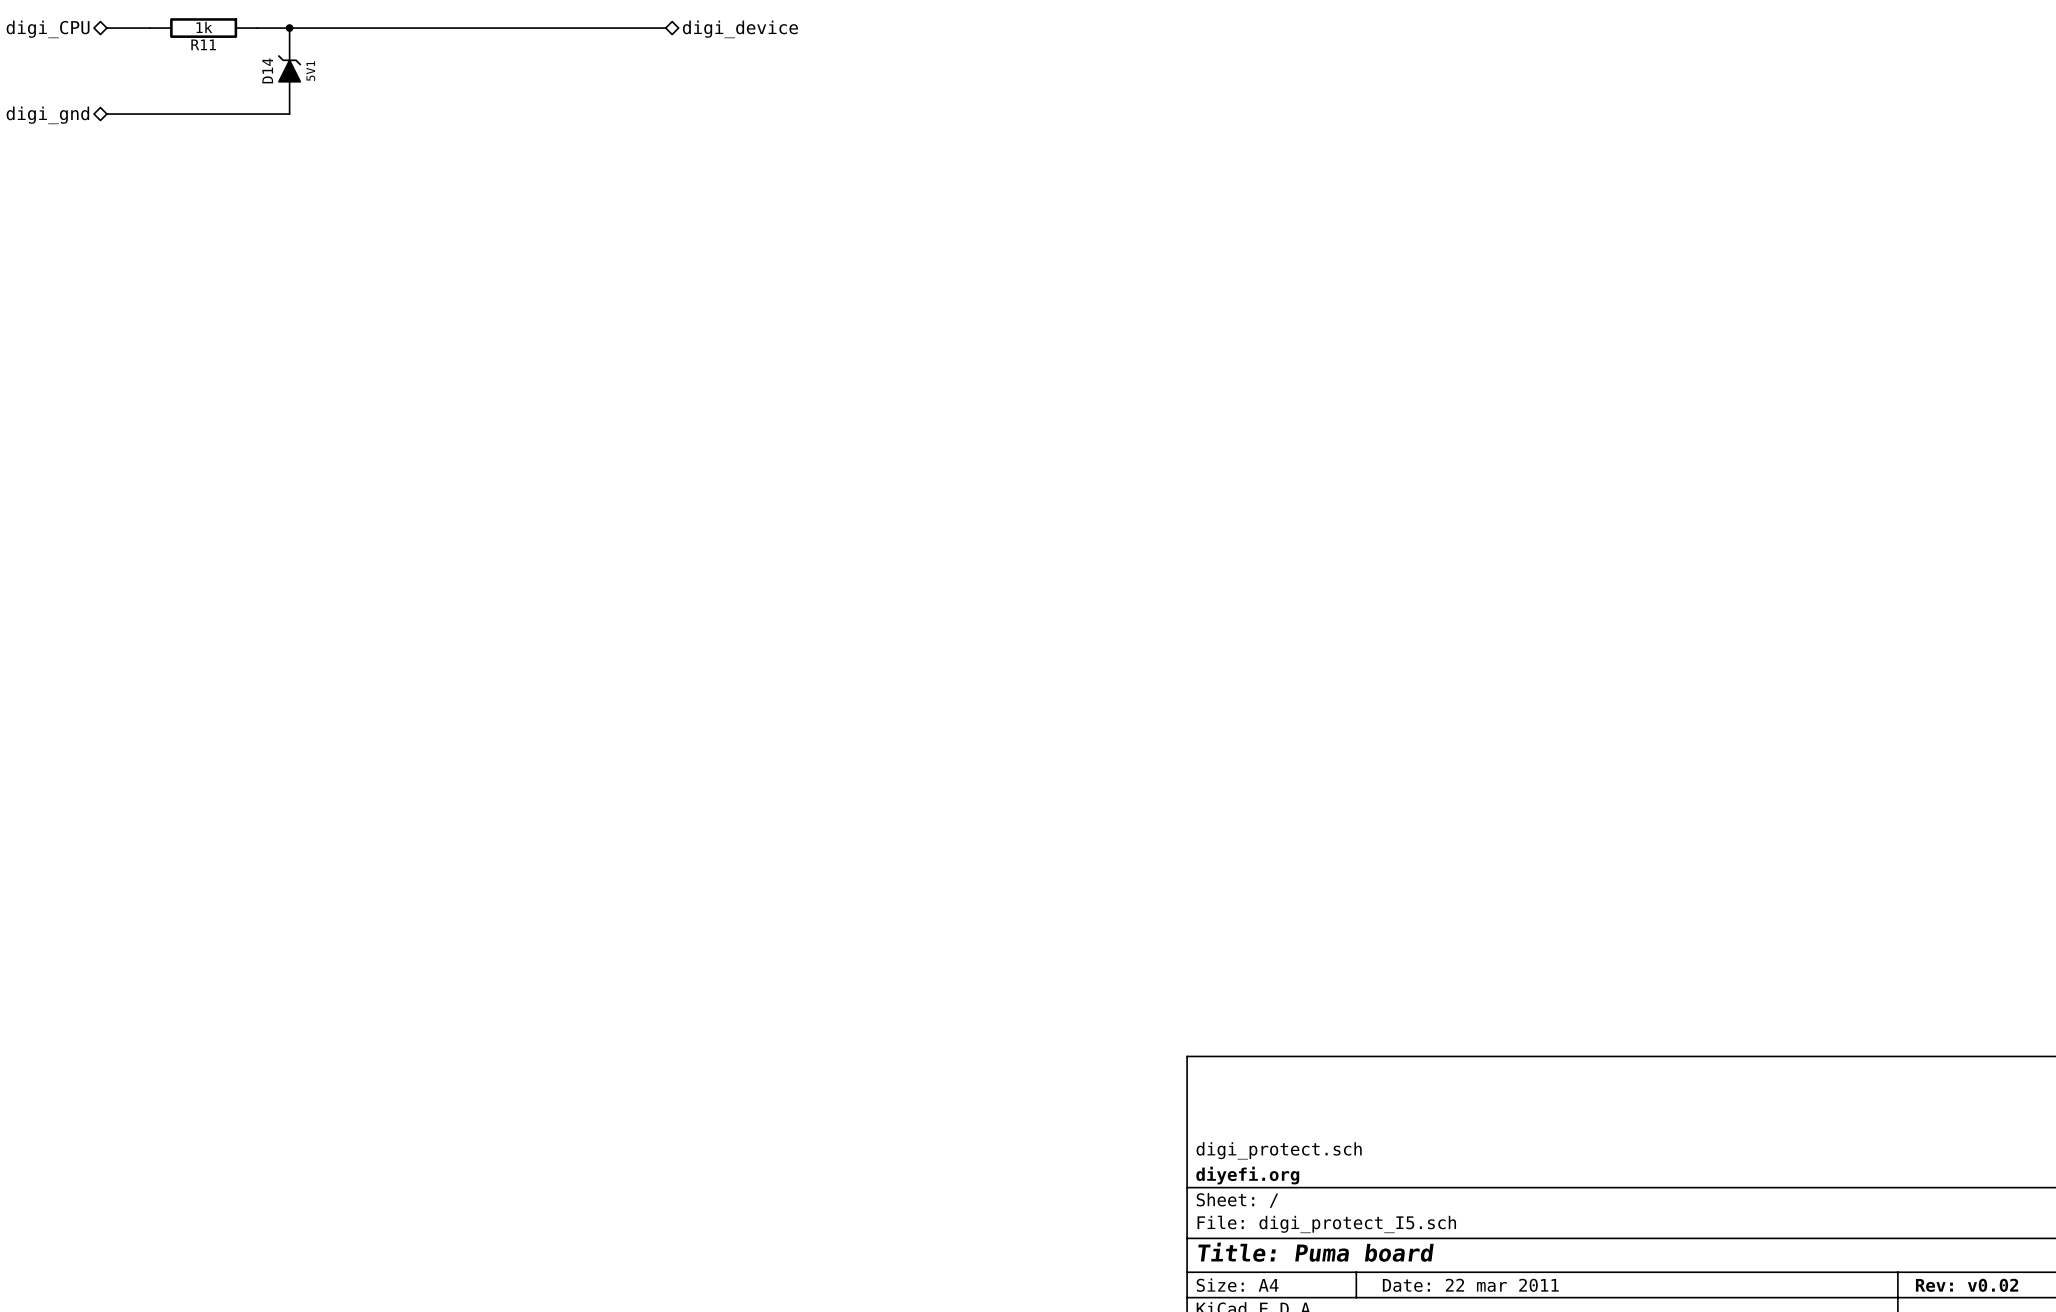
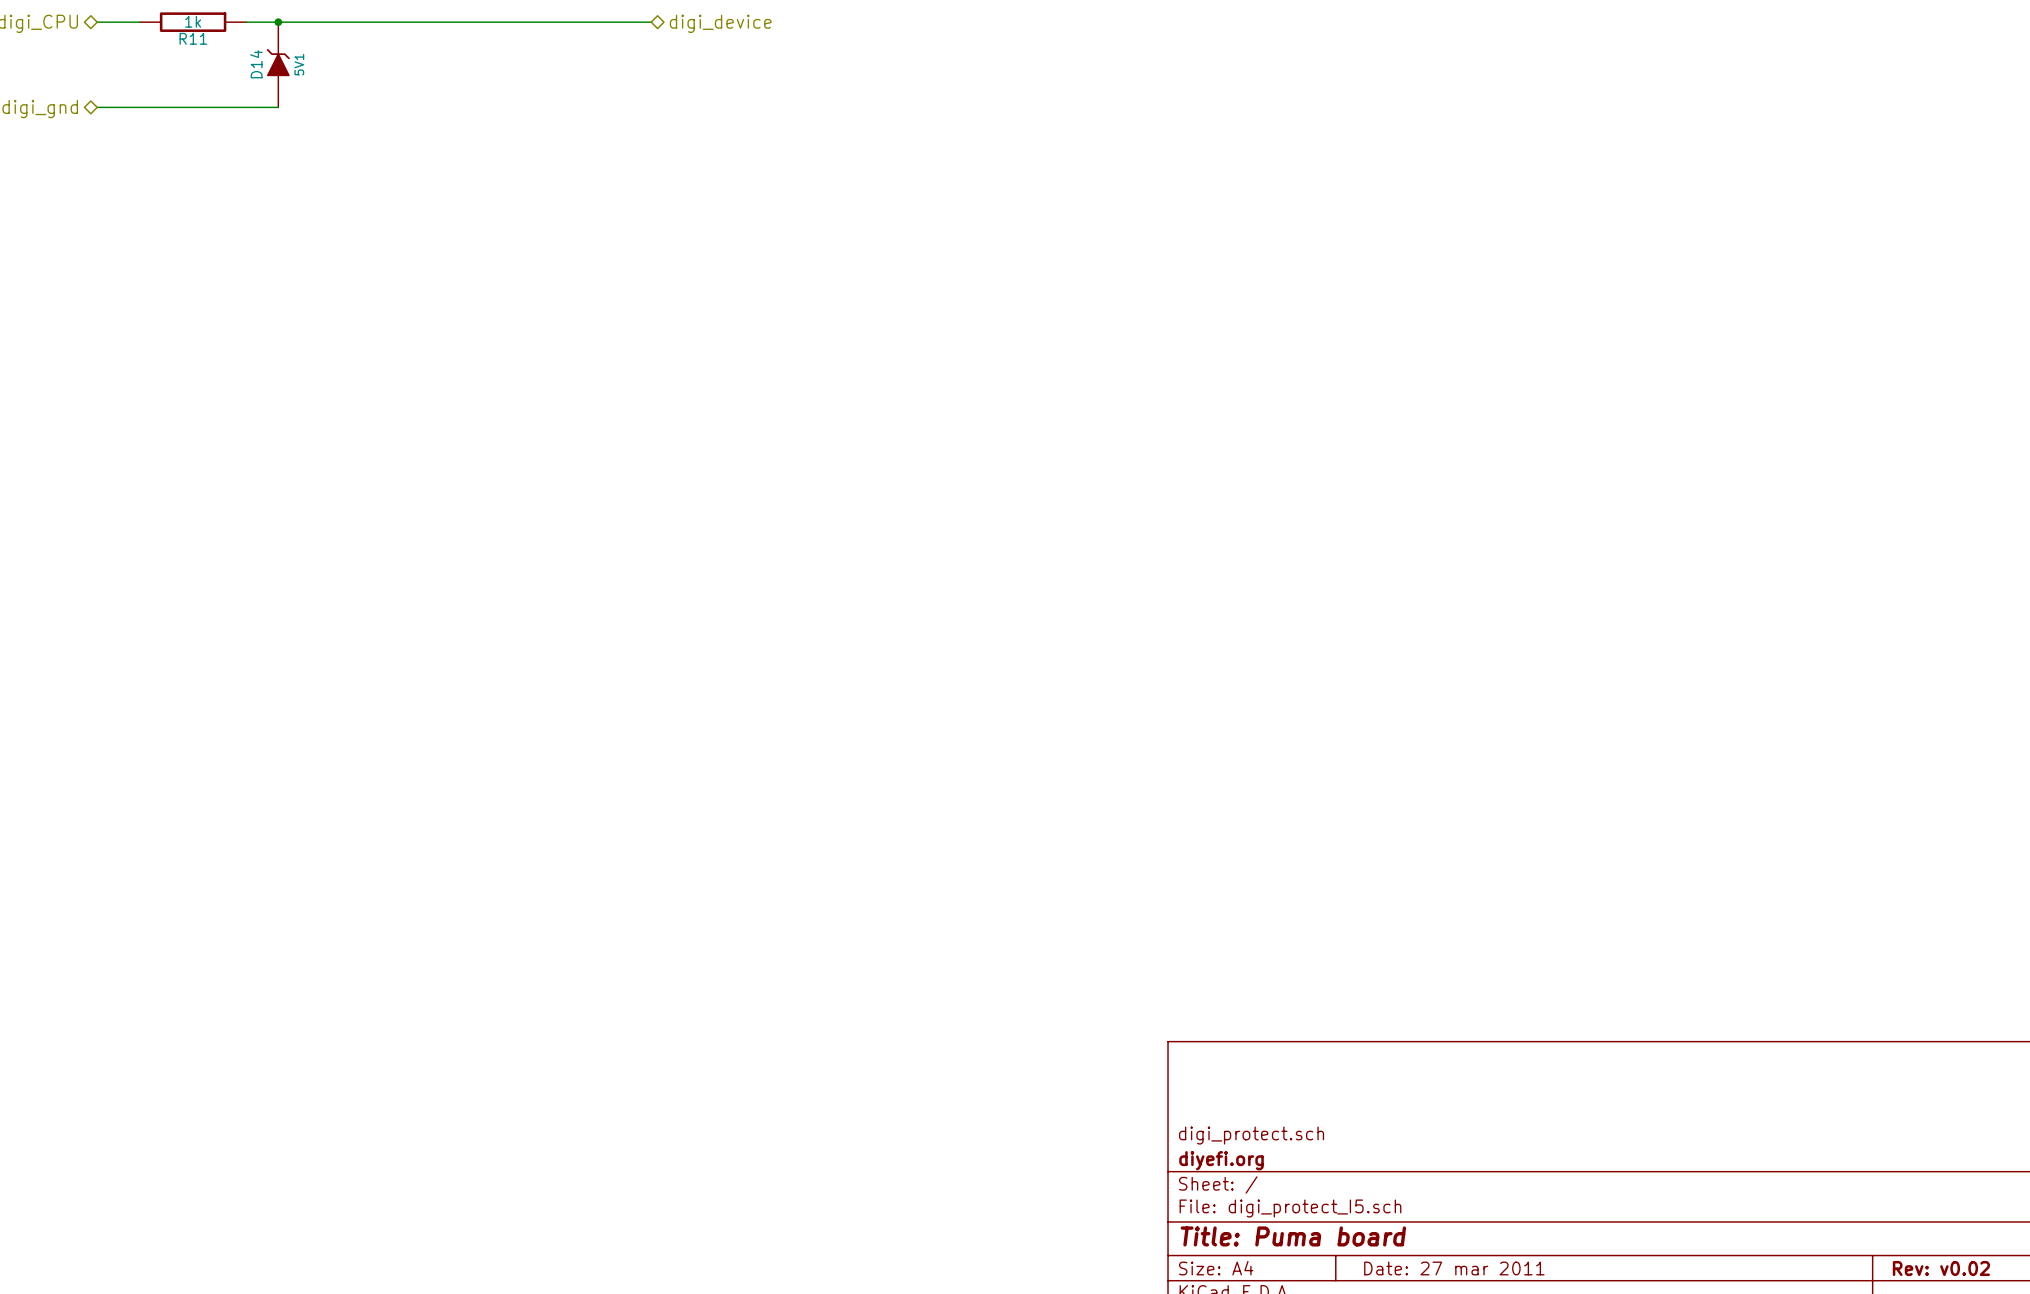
title block: Date: 22 mar 2011 (1470, 1285) -> Date: 27 mar 2011 (1454, 1268)

